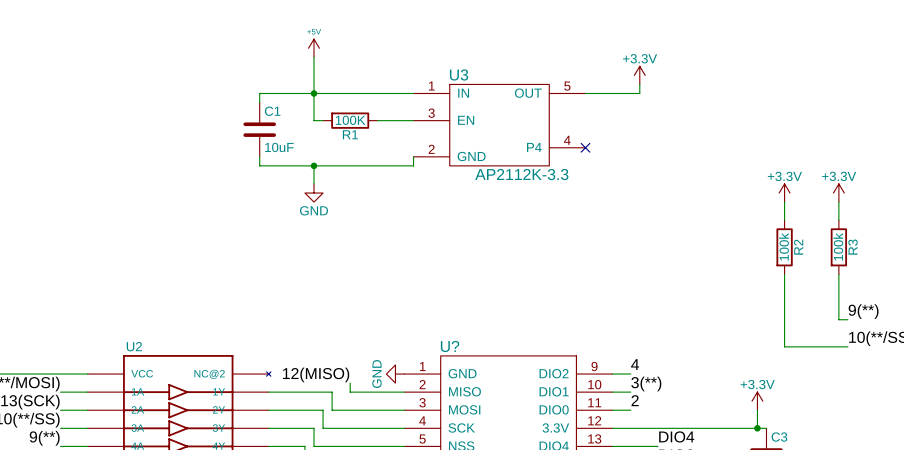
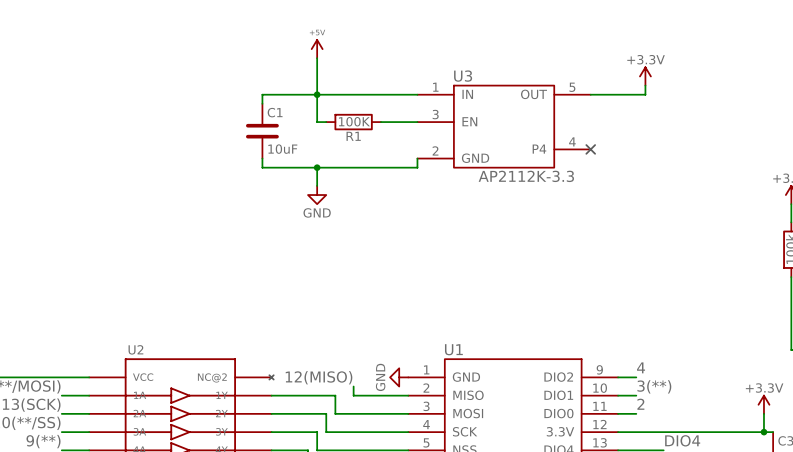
U? name: U? (450, 346) -> U1 (453, 349)

